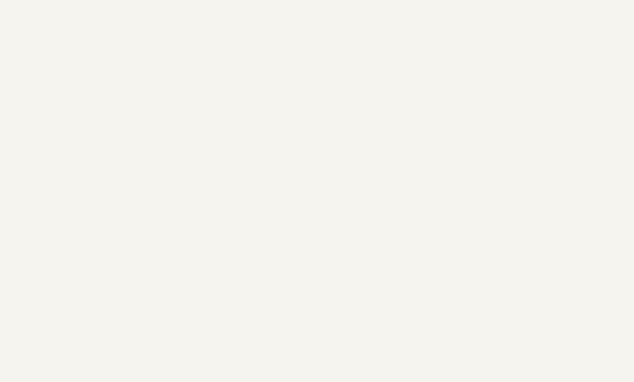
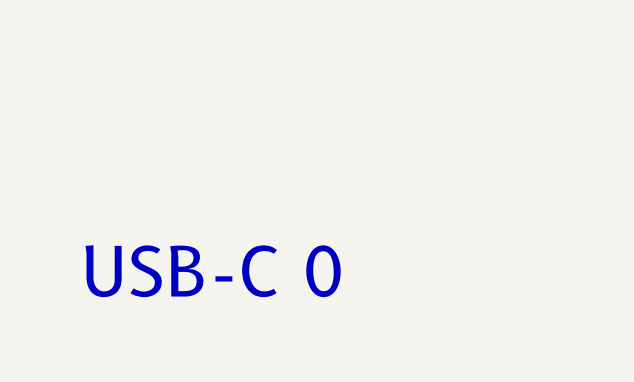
text: none -> USB-C 0 (213, 271)

